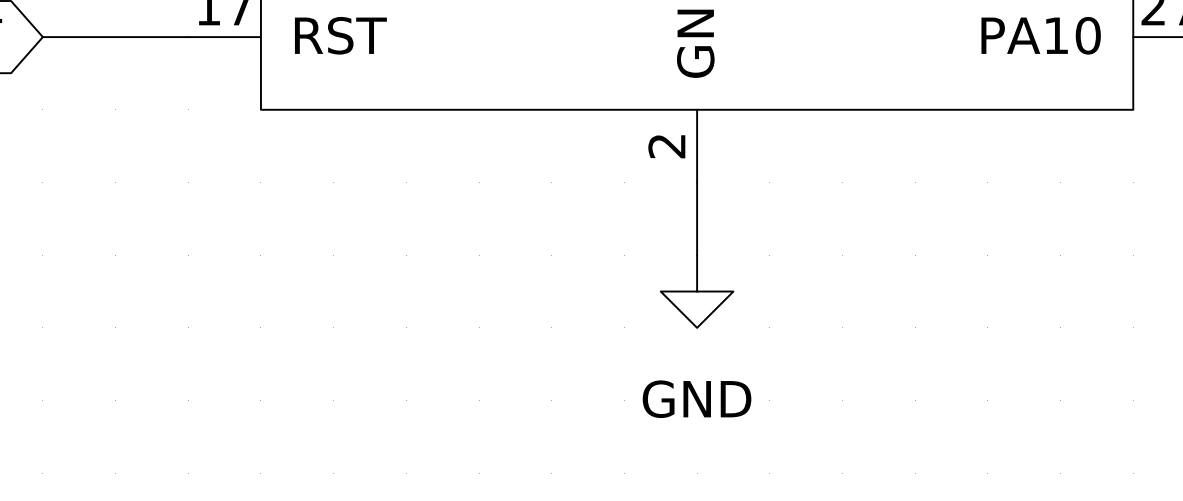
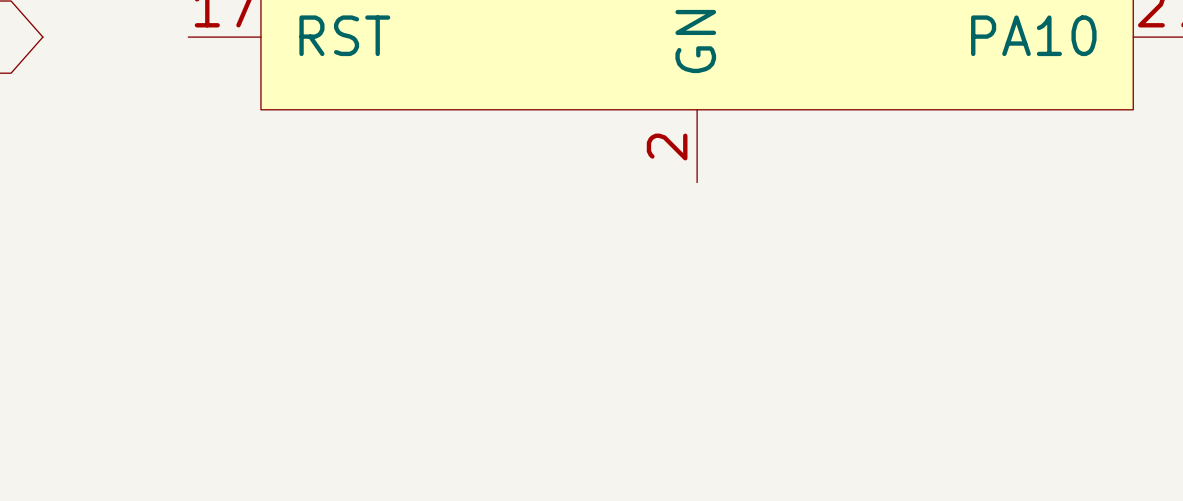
wire: (42, 37) (188, 37) -> none
wire: (697, 182) (697, 255) -> none
power symbol: GND (697, 291) -> none

